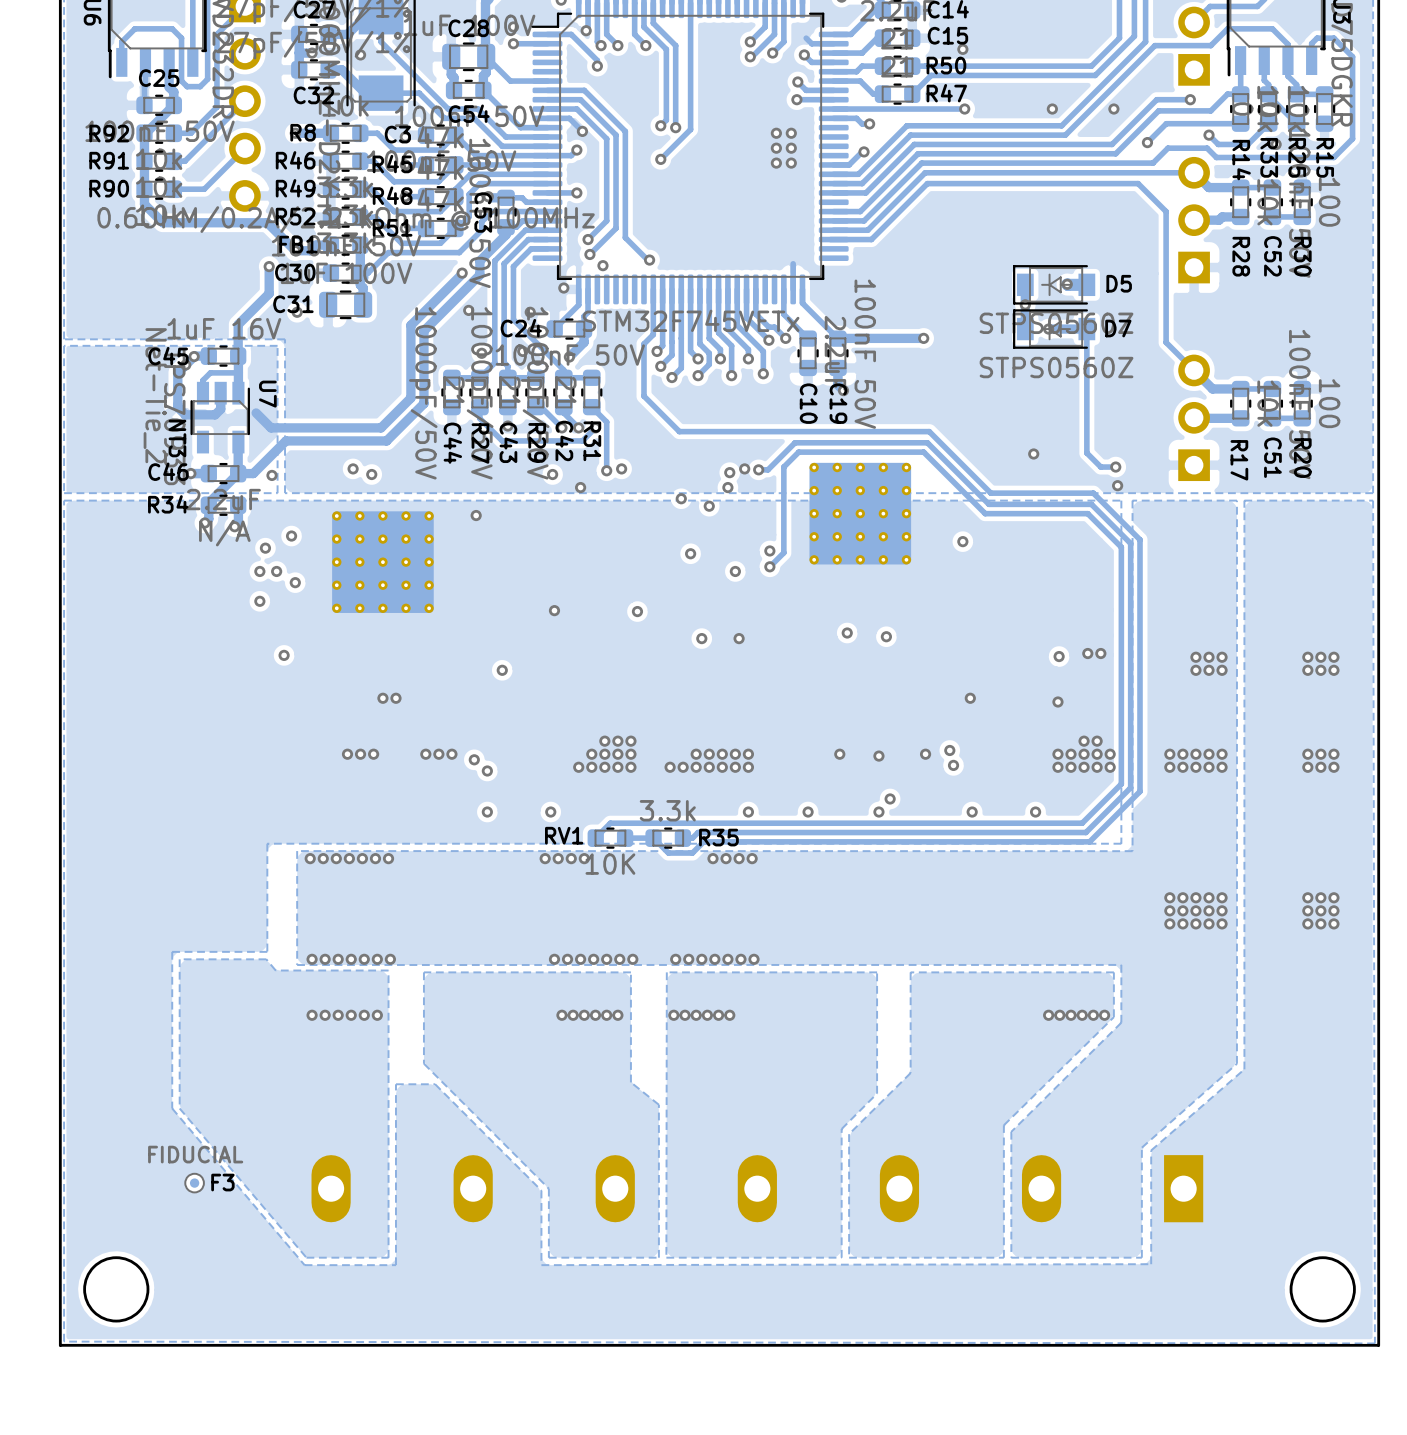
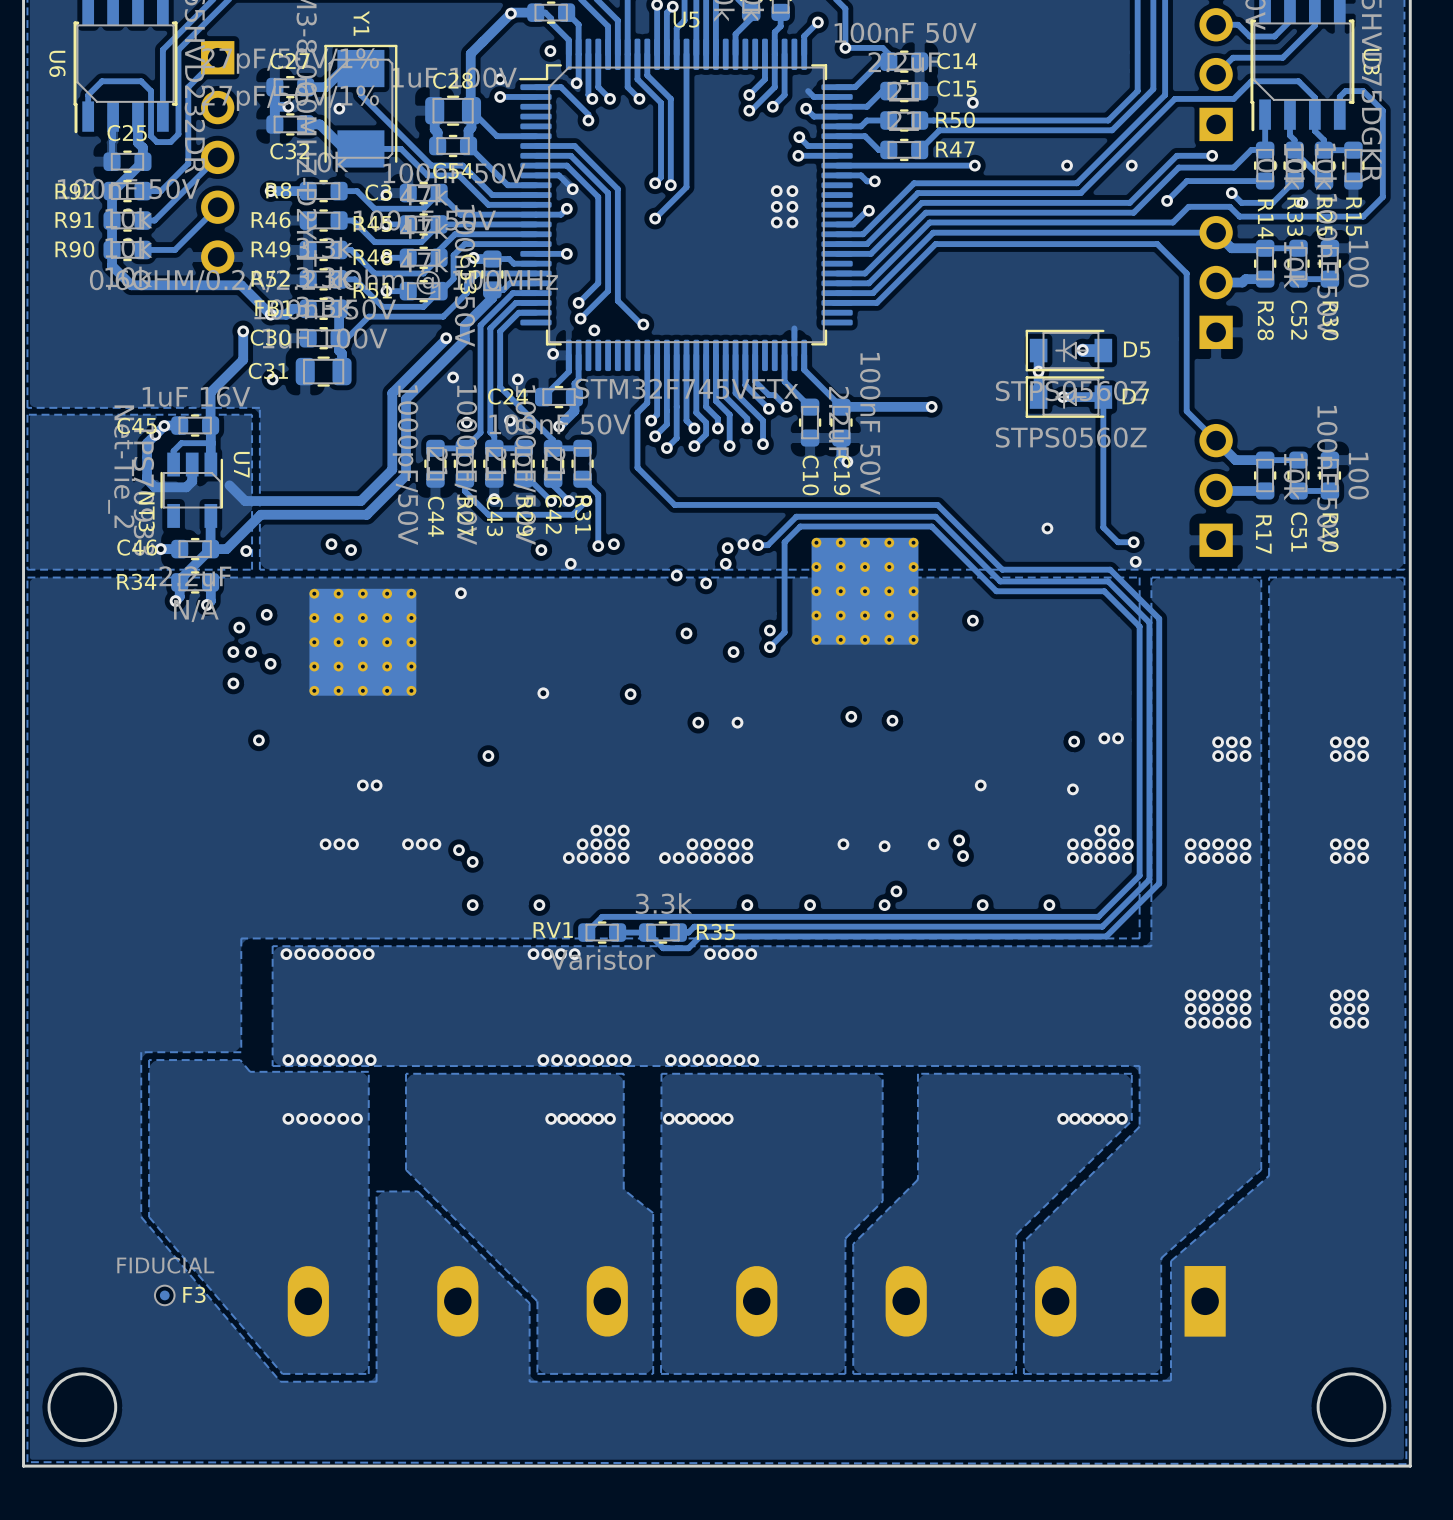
RV1 value: 10K (610, 864) -> Varistor (602, 959)

